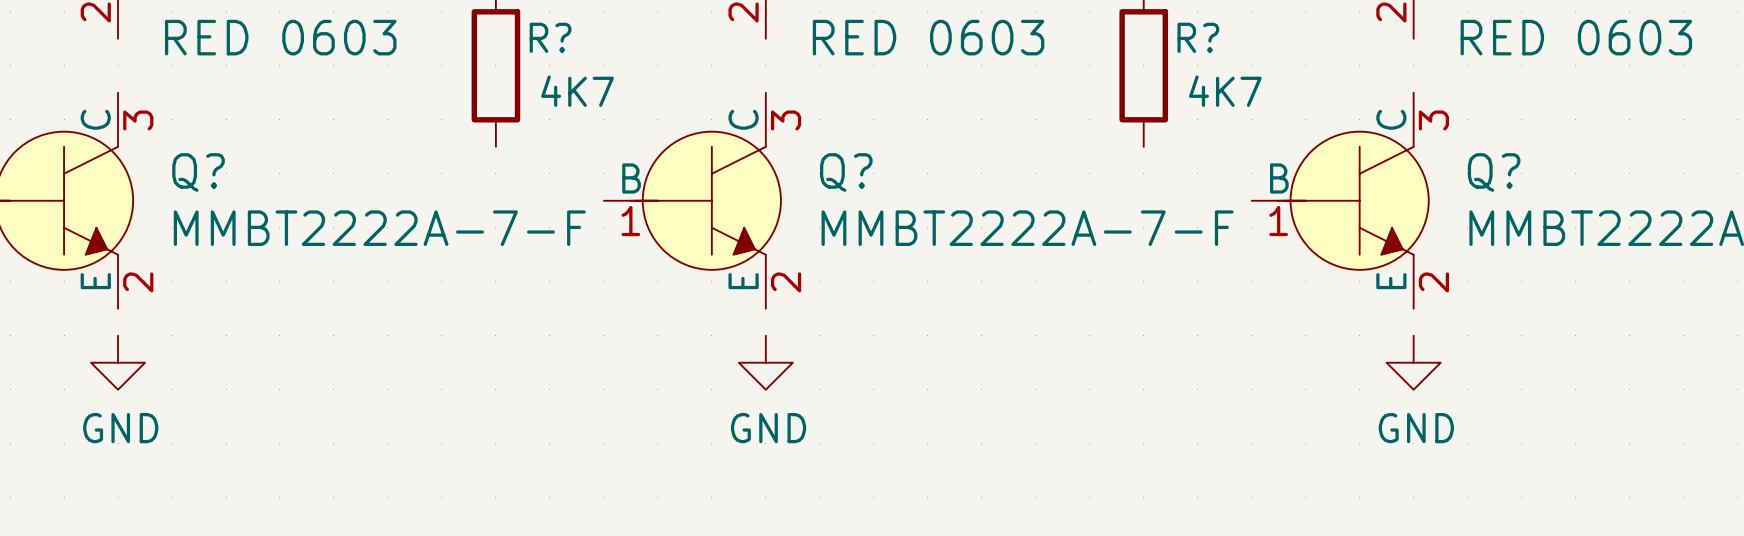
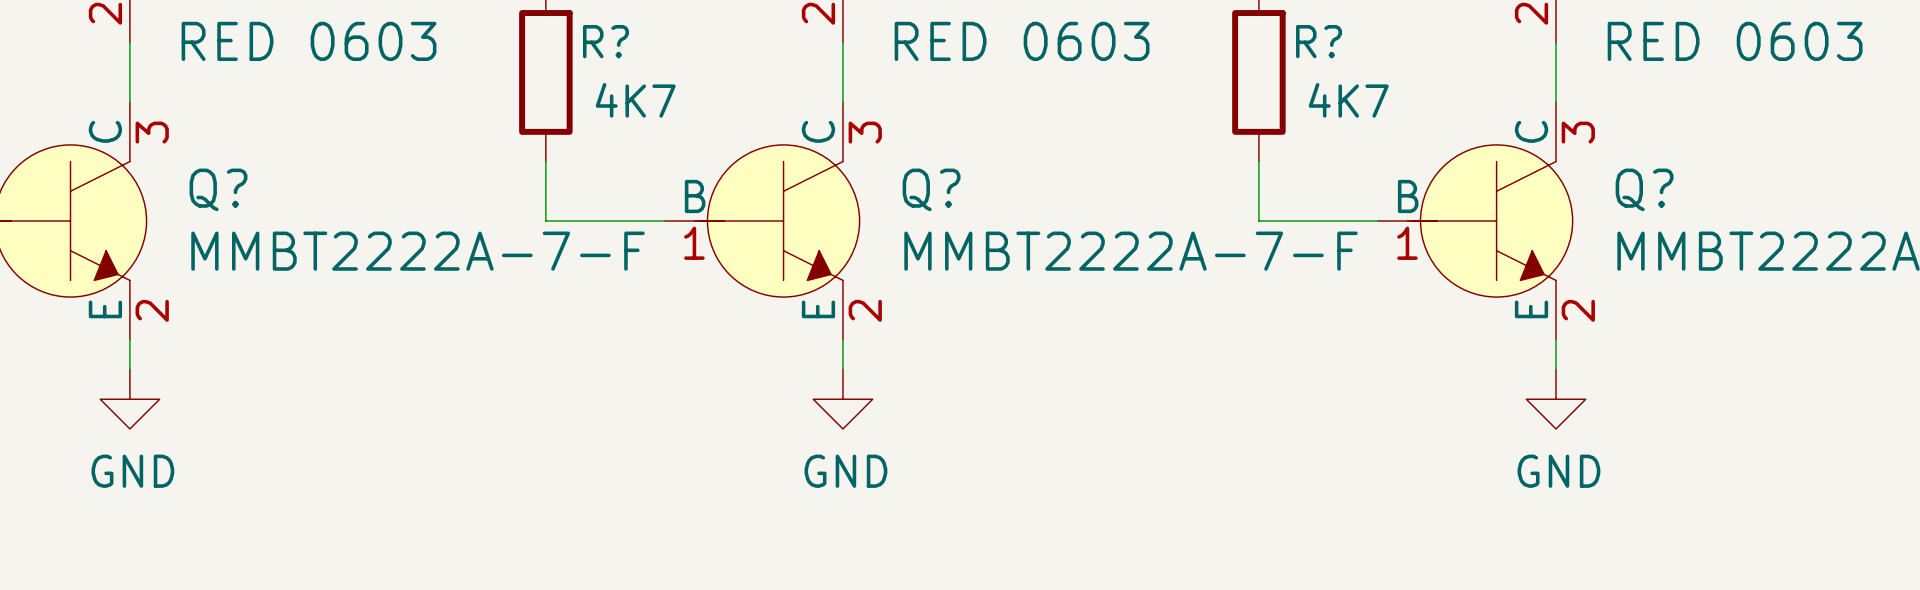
wire: none -> (129, 42) (129, 102)
wire: none -> (842, 42) (842, 102)
wire: none -> (1556, 42) (1556, 102)
wire: none -> (545, 161) (545, 220) (664, 220)
wire: none -> (1258, 161) (1258, 220) (1377, 220)
wire: none -> (129, 339) (129, 369)
wire: none -> (842, 339) (842, 369)
wire: none -> (1556, 339) (1556, 369)

